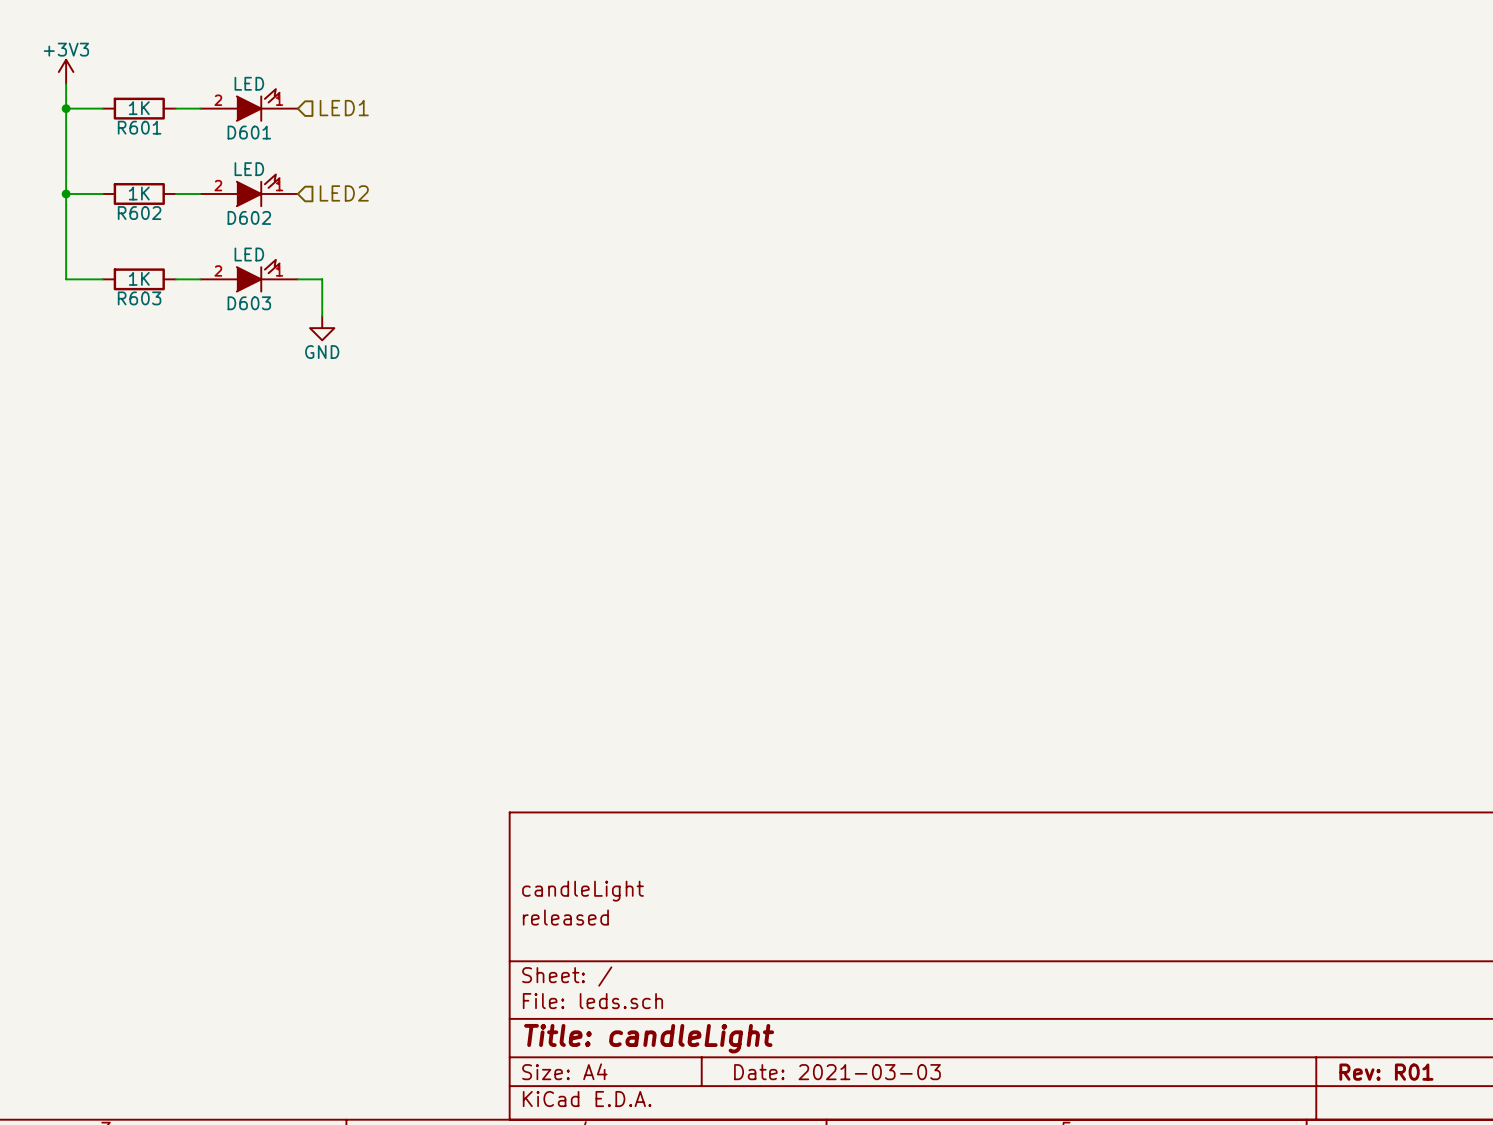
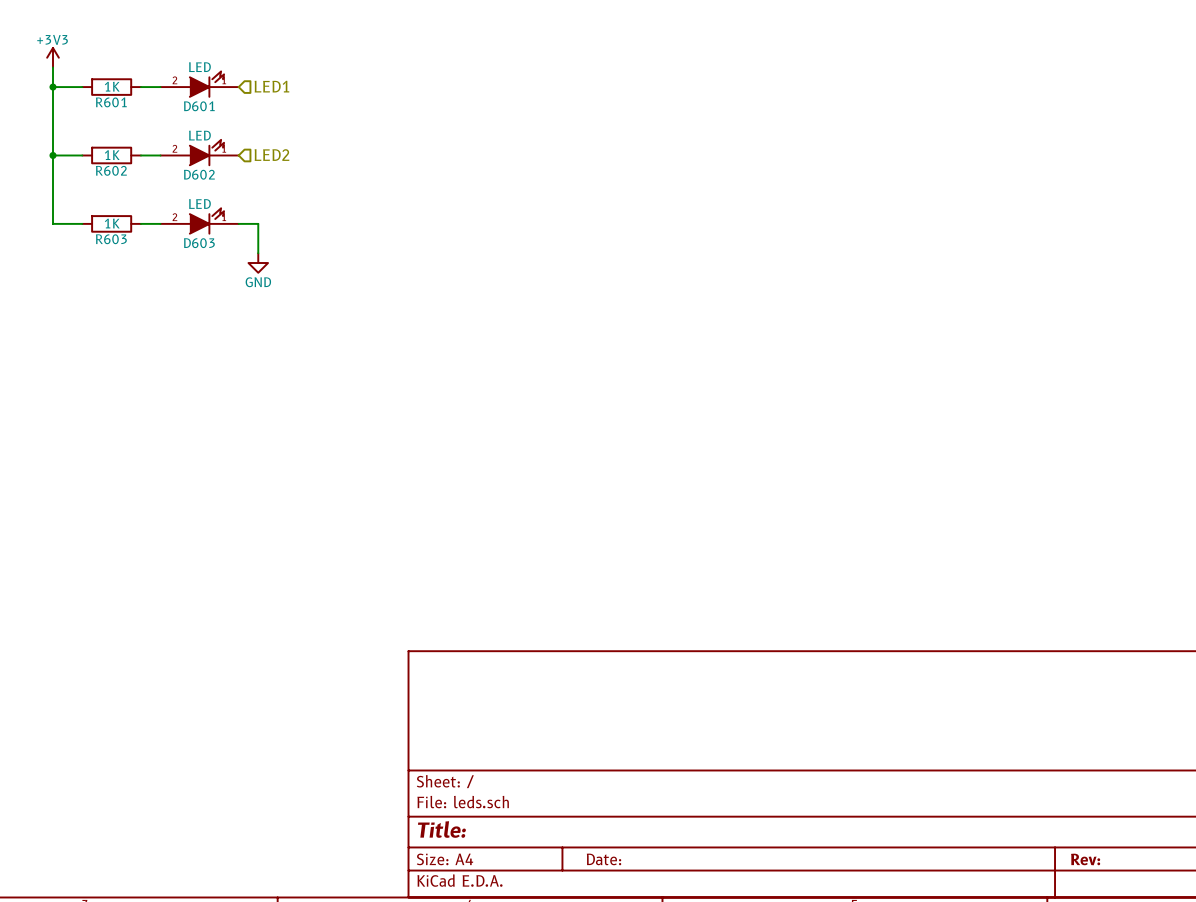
title block: candleLight (583, 891) -> none
title block: released (565, 917) -> none
title block: Title: candleLight (649, 1038) -> Title: (441, 829)
title block: Date: 2021-03-03 (837, 1072) -> Date: (604, 859)
title block: Rev: R01 (1386, 1072) -> Rev: (1085, 859)

